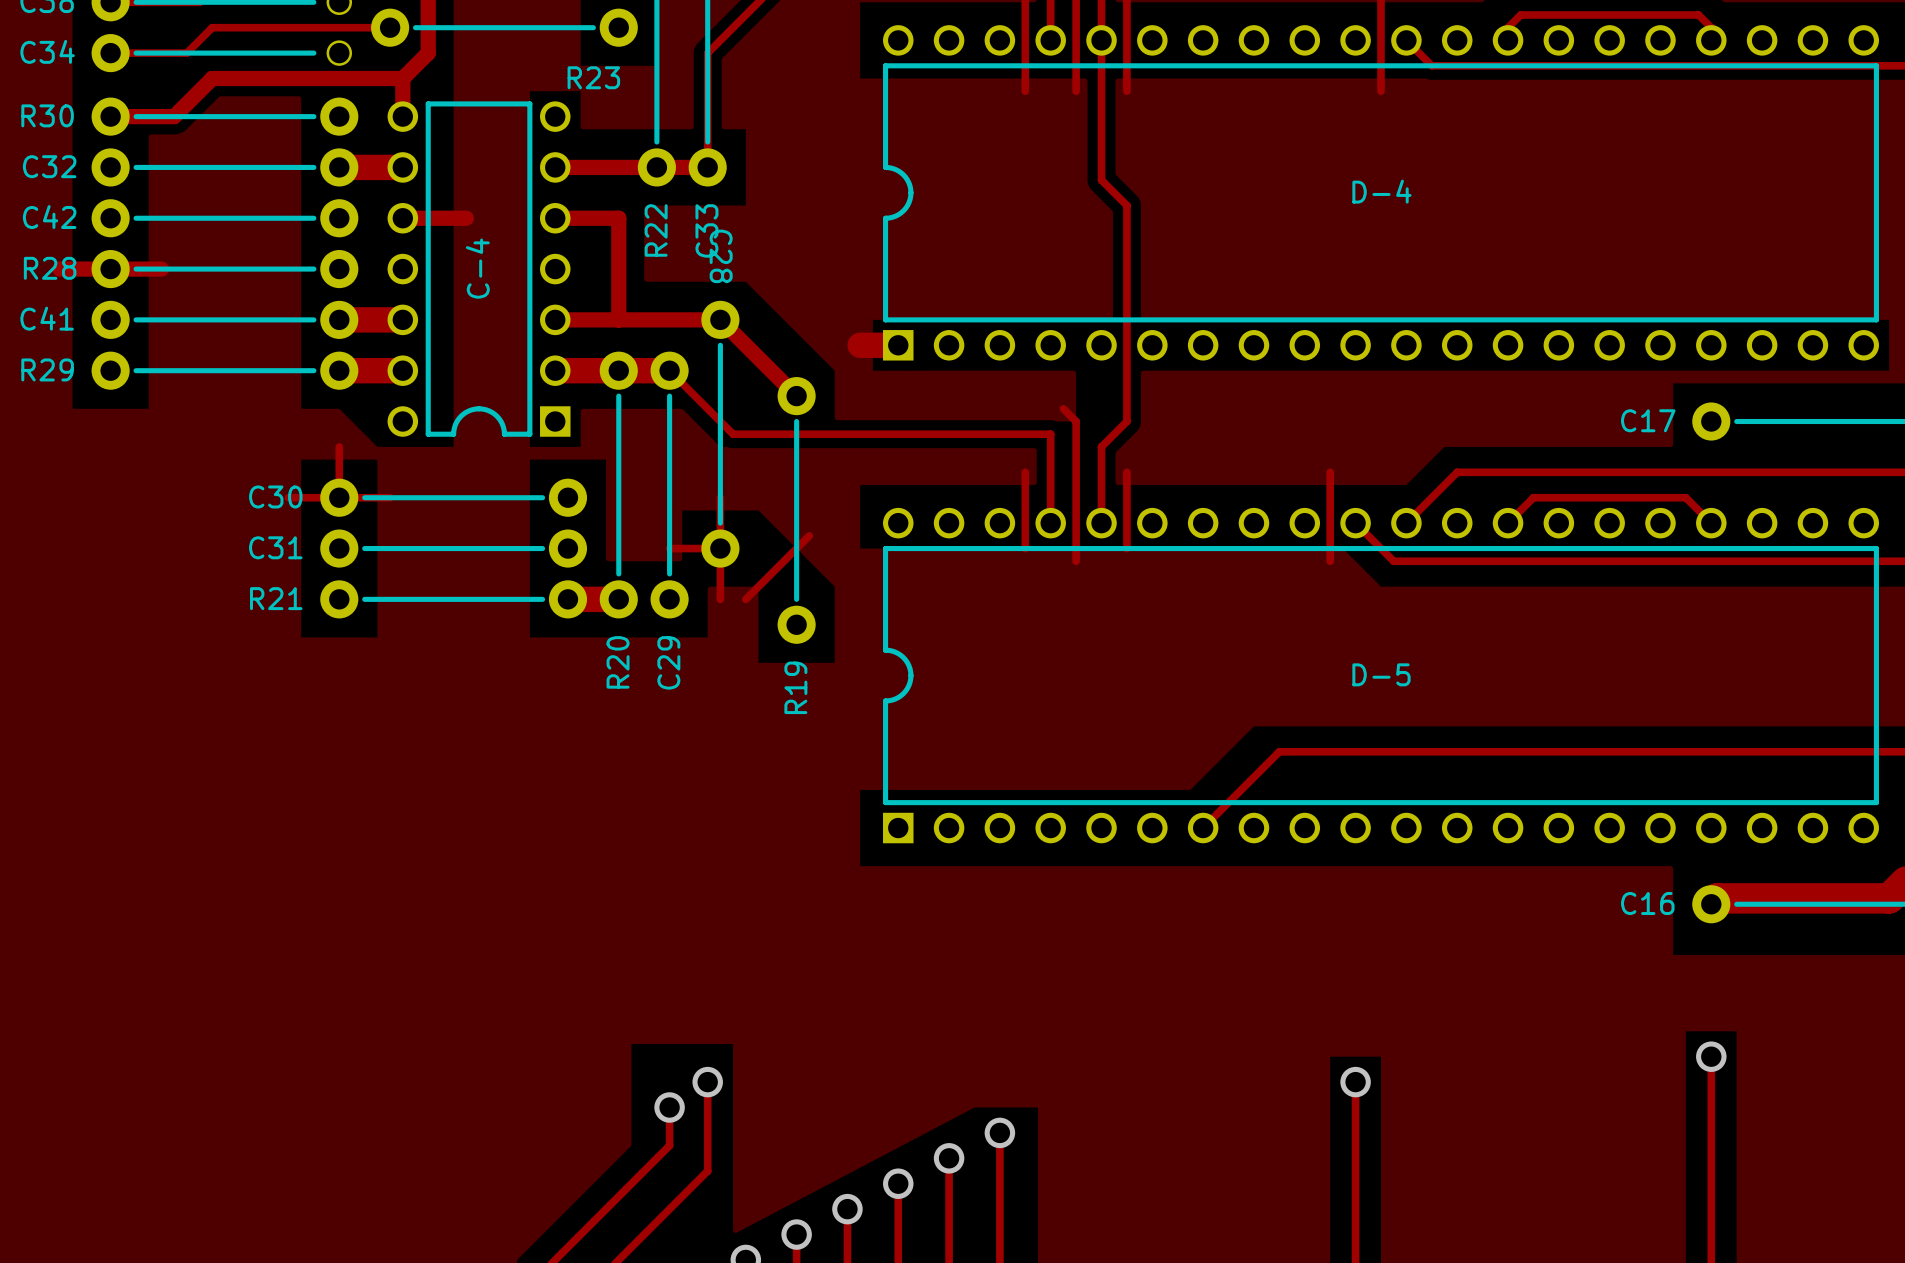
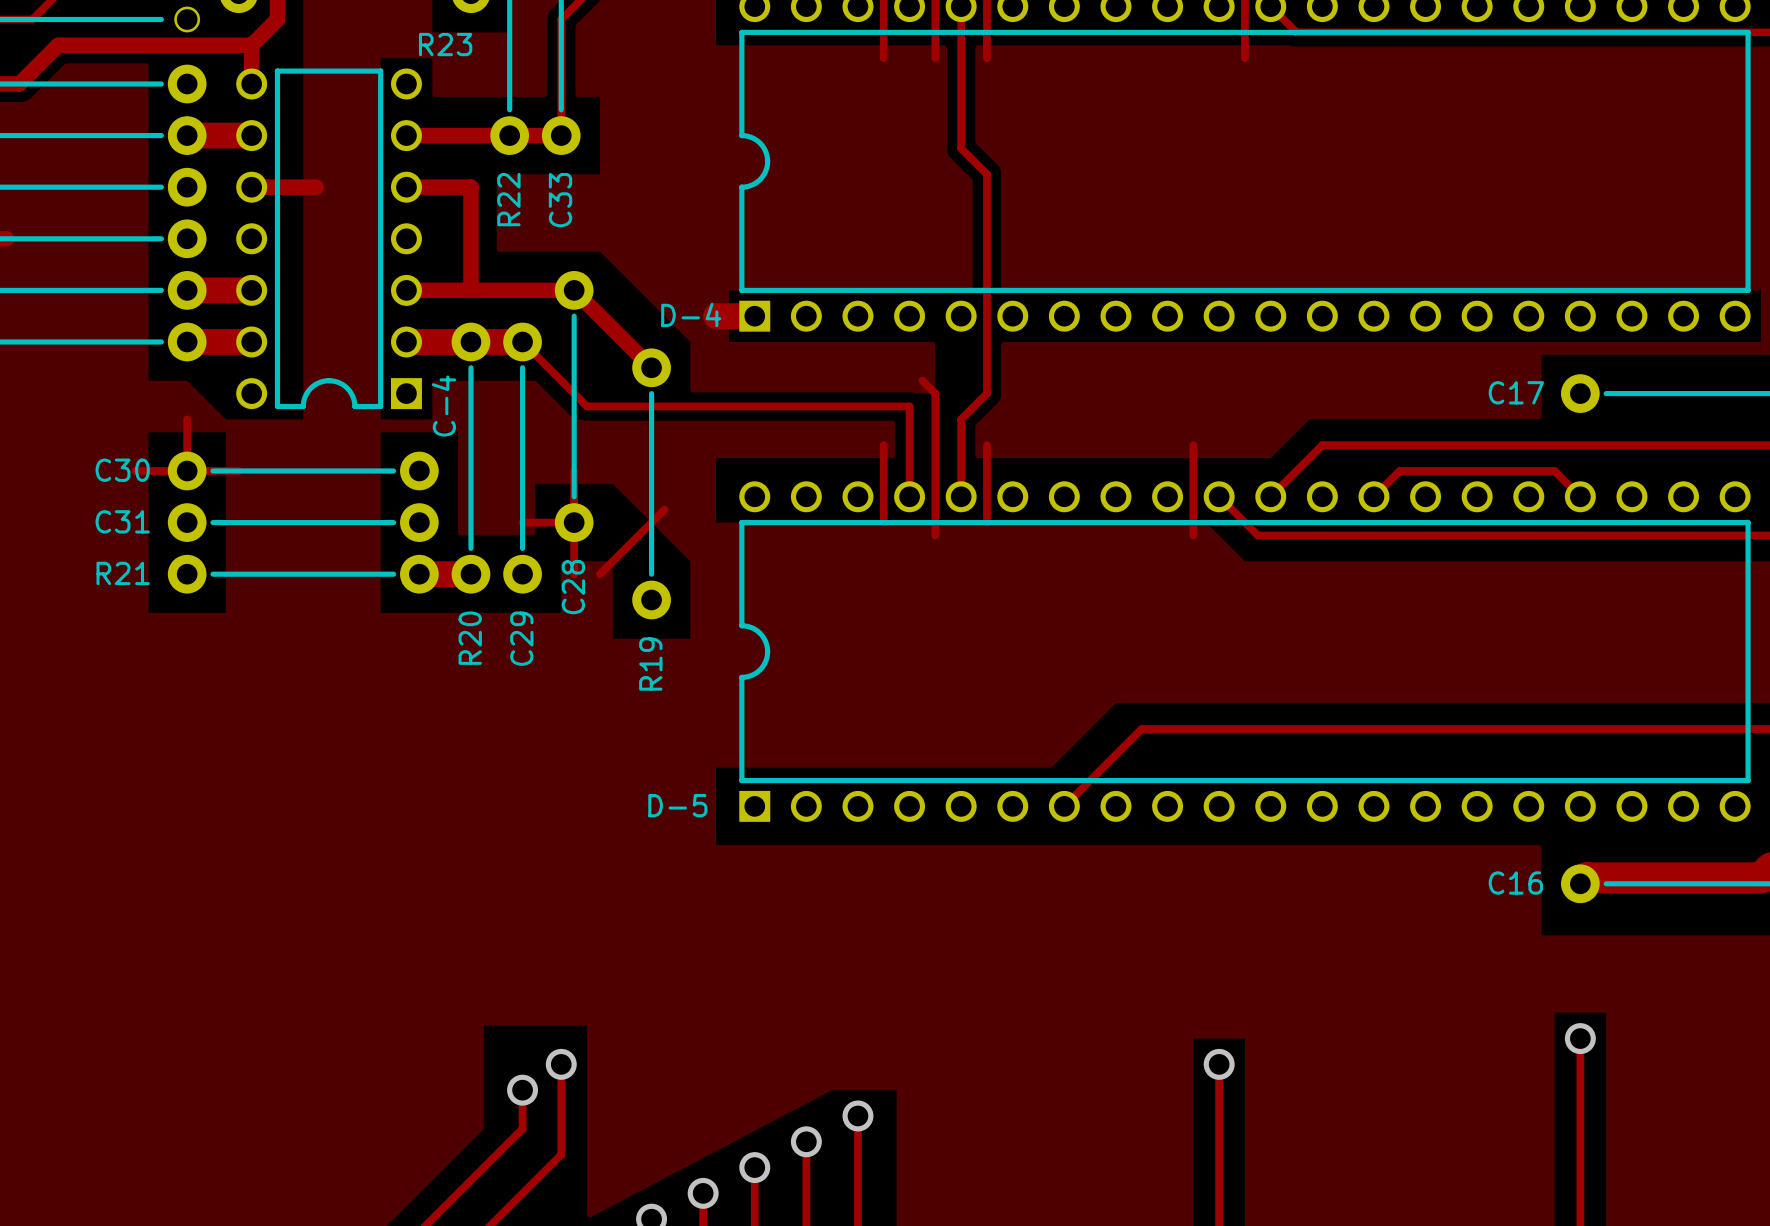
D-4 name position: D-4 (1381, 191) -> D-4 (691, 314)
C28 name rotation: 0° (721, 256) -> 180° (573, 587)
C28 name position: C28 (721, 256) -> C28 (573, 587)
C-4 name position: C-4 (477, 268) -> C-4 (443, 406)
D-5 name position: D-5 (1381, 674) -> D-5 (677, 805)

